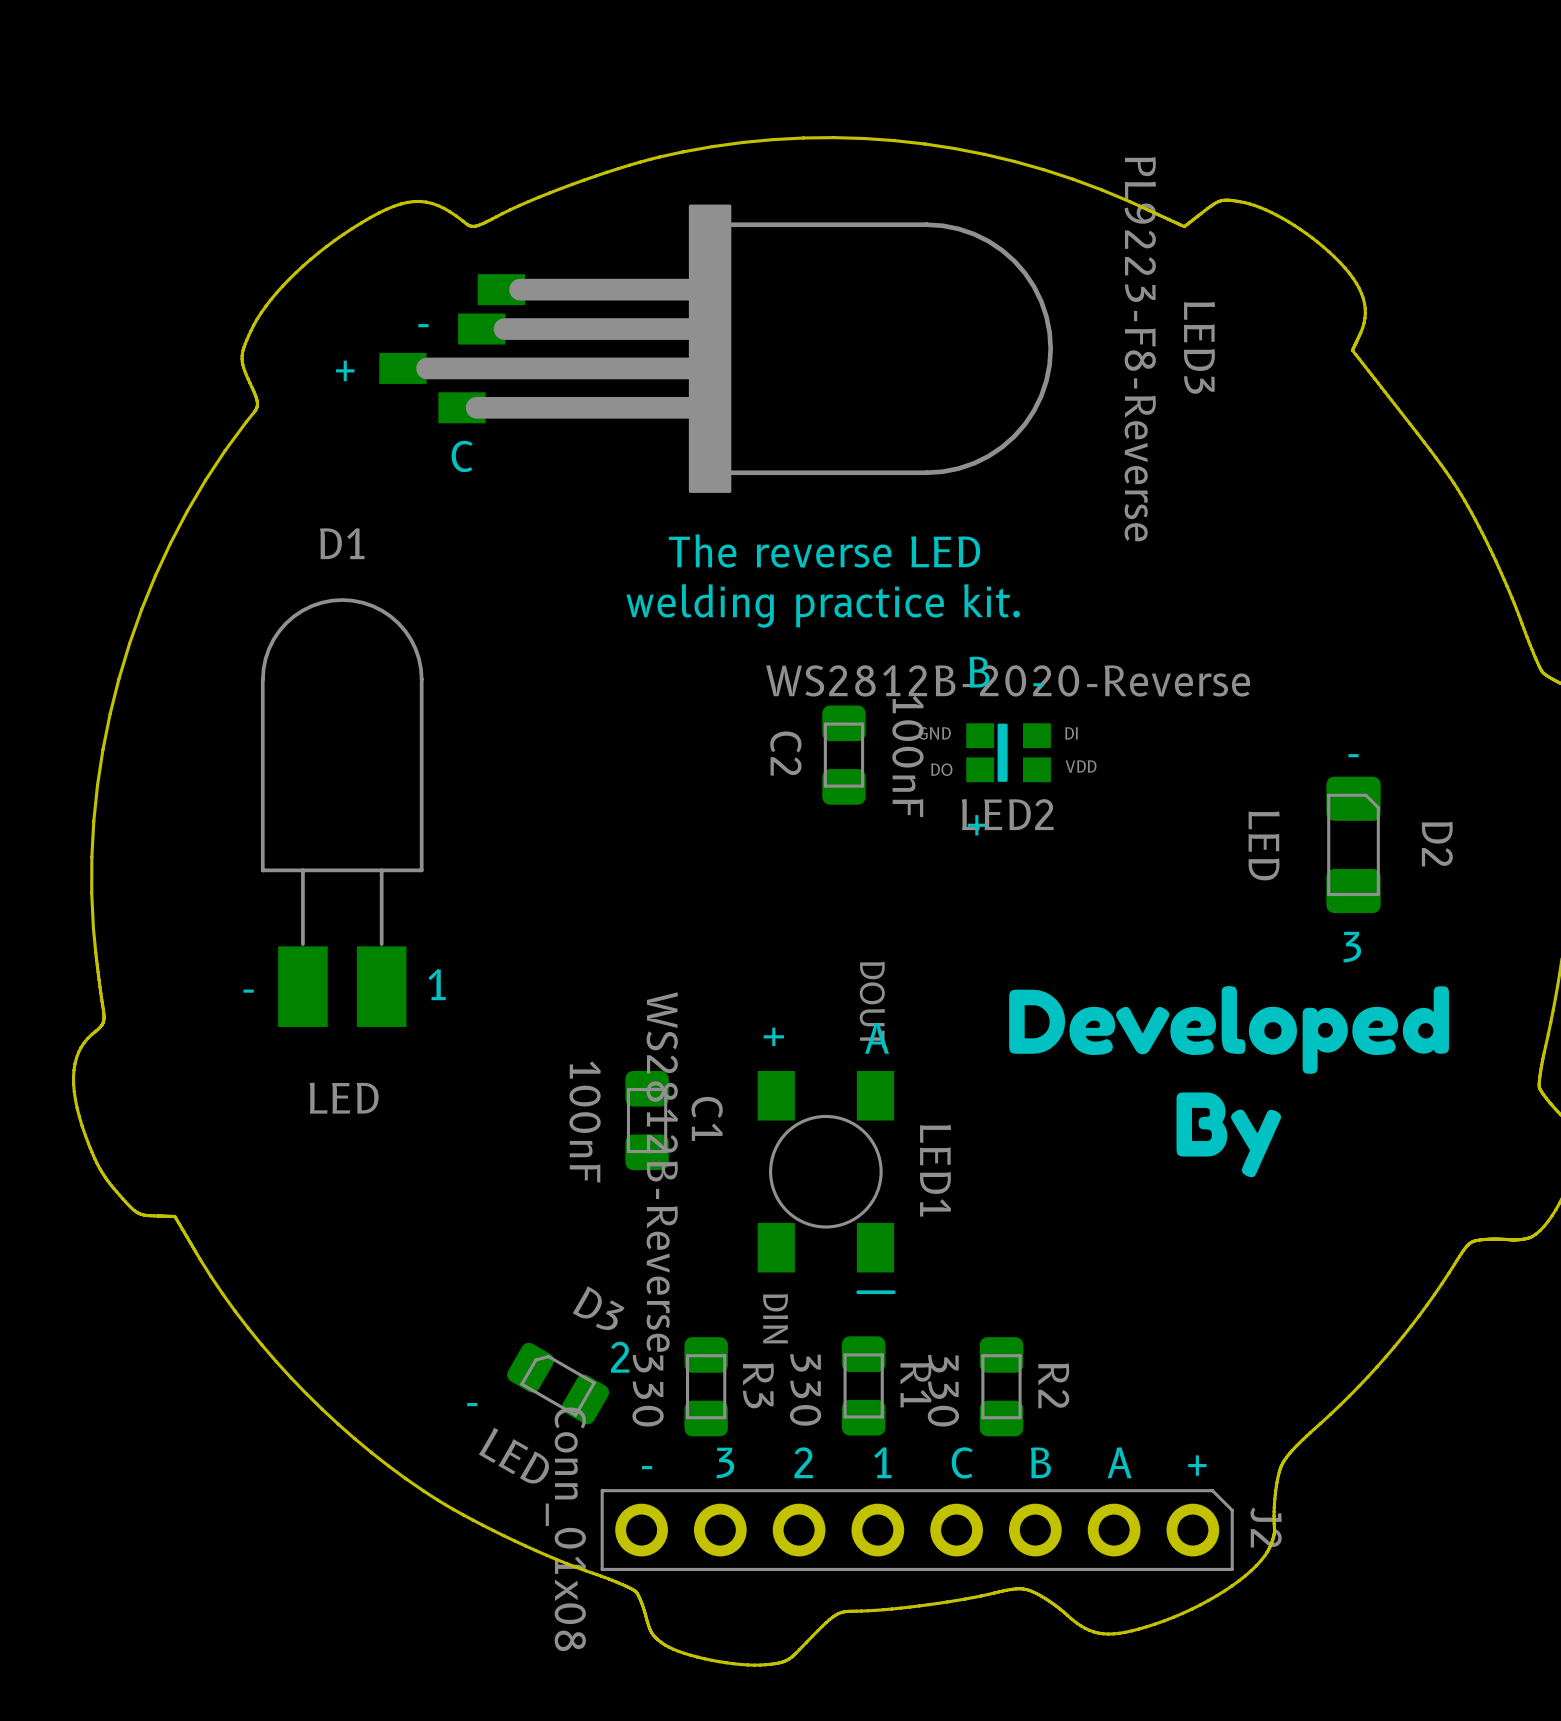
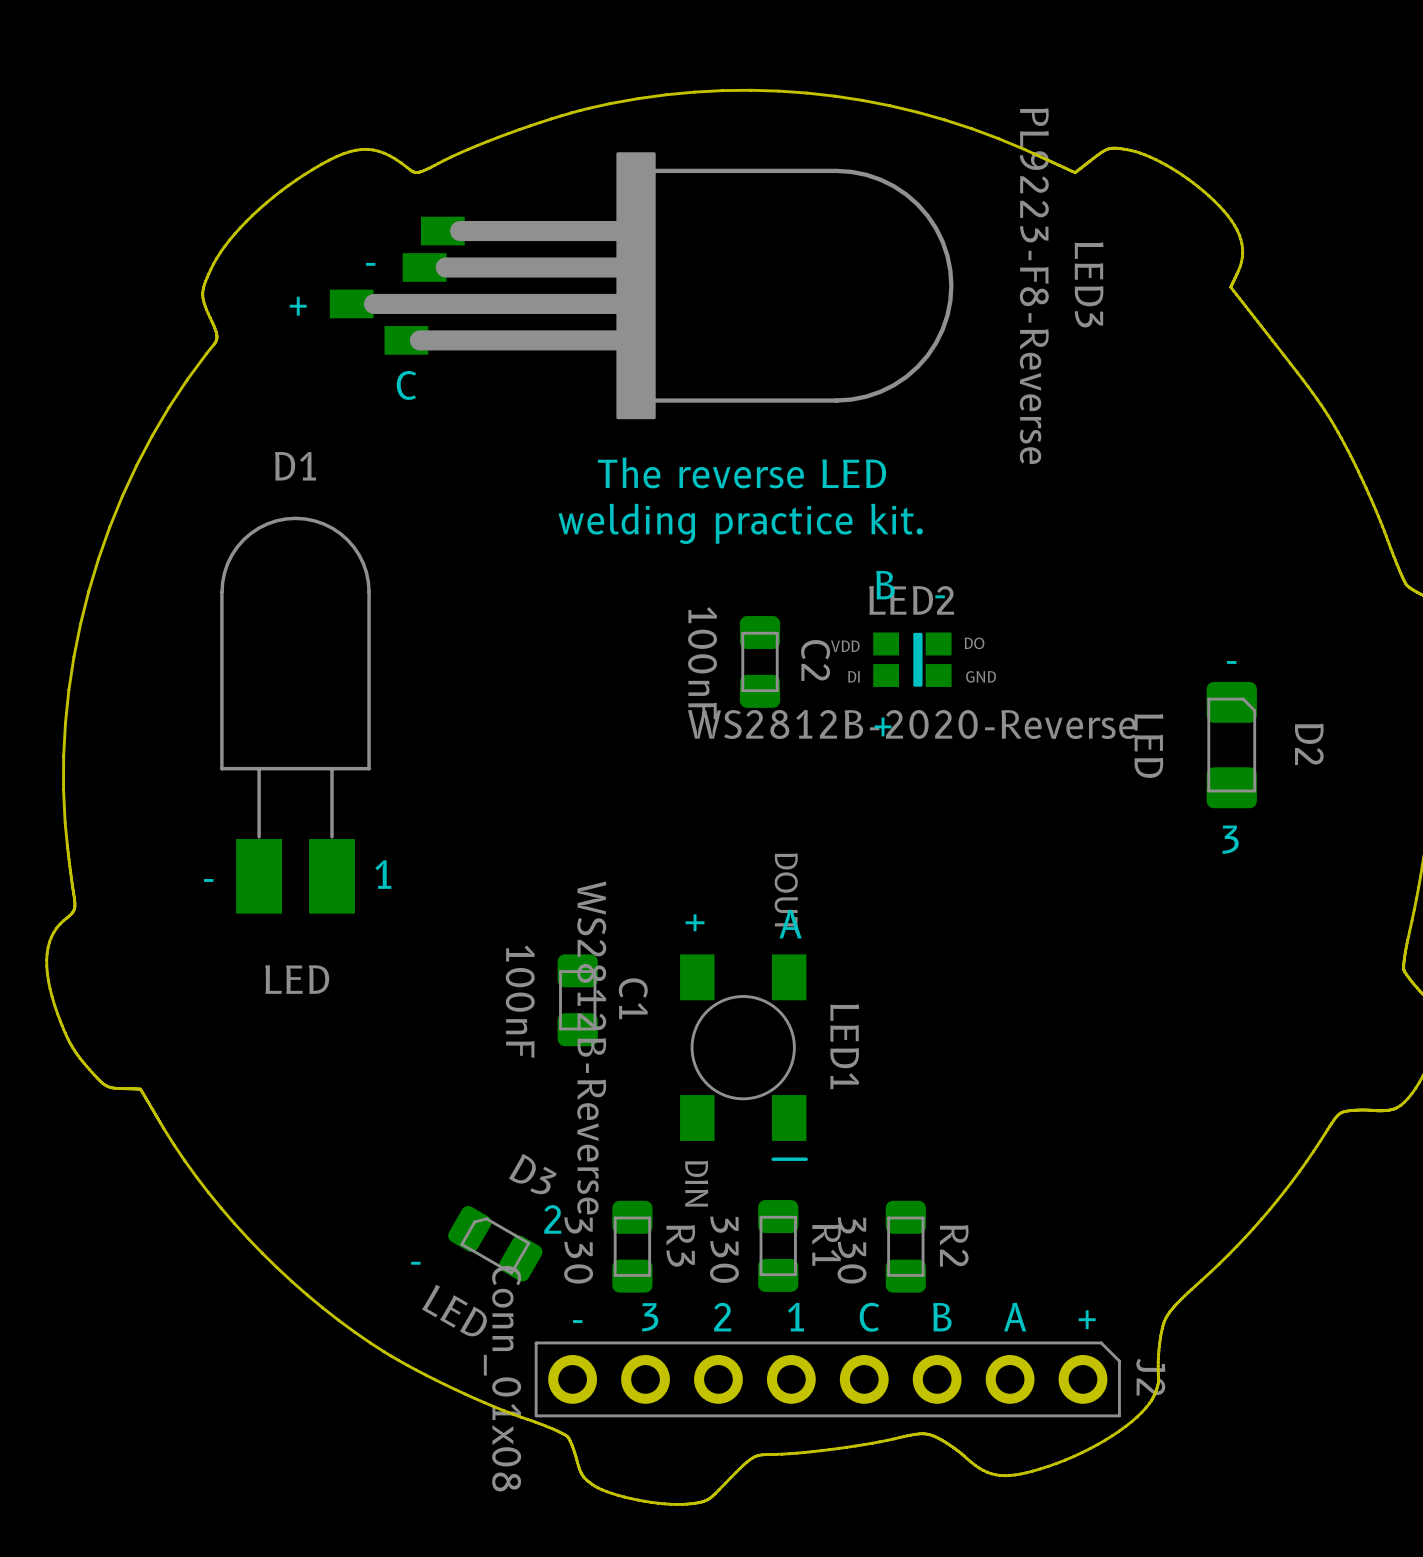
LED2 rotation: 0° (1008, 752) -> 180° (912, 659)
C2 name position: C2 (785, 753) -> C2 (815, 660)
C2 value position: 100nF (907, 756) -> 100nF (702, 663)
drawing: [1009, 986, 1449, 1178] -> none

